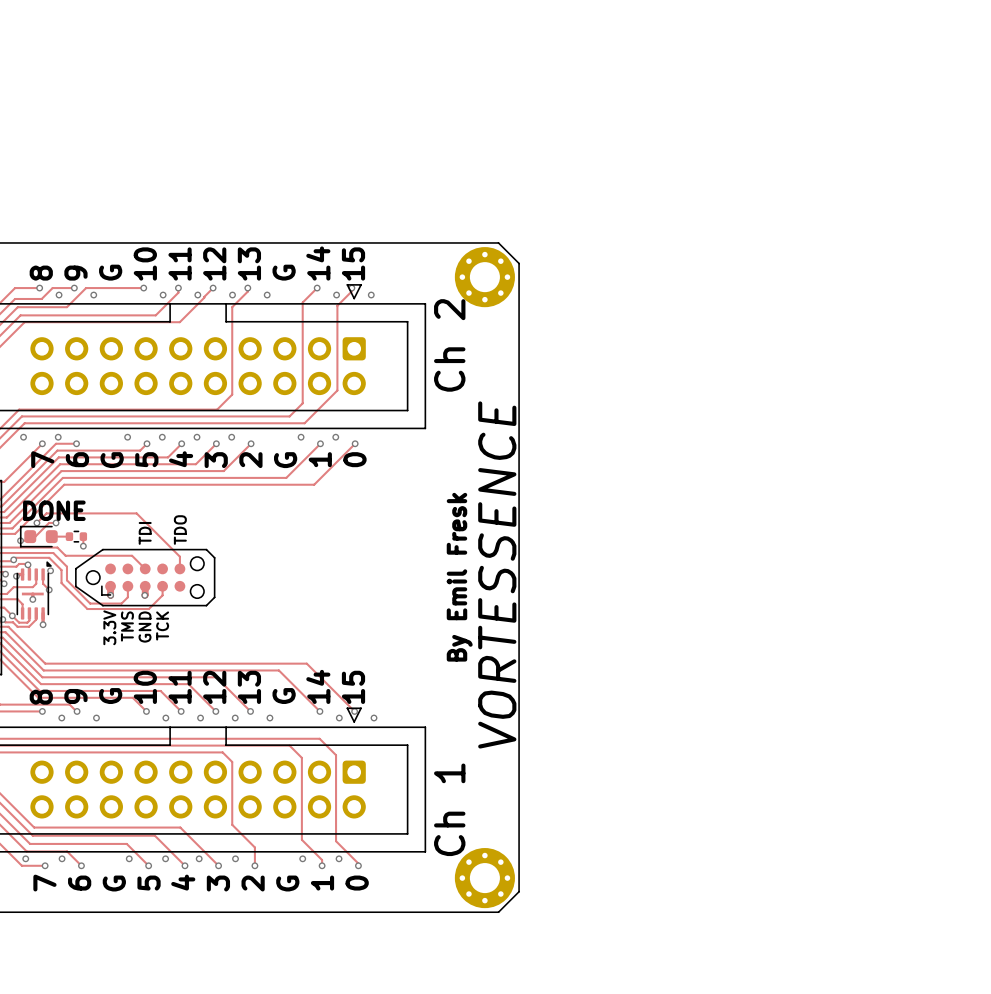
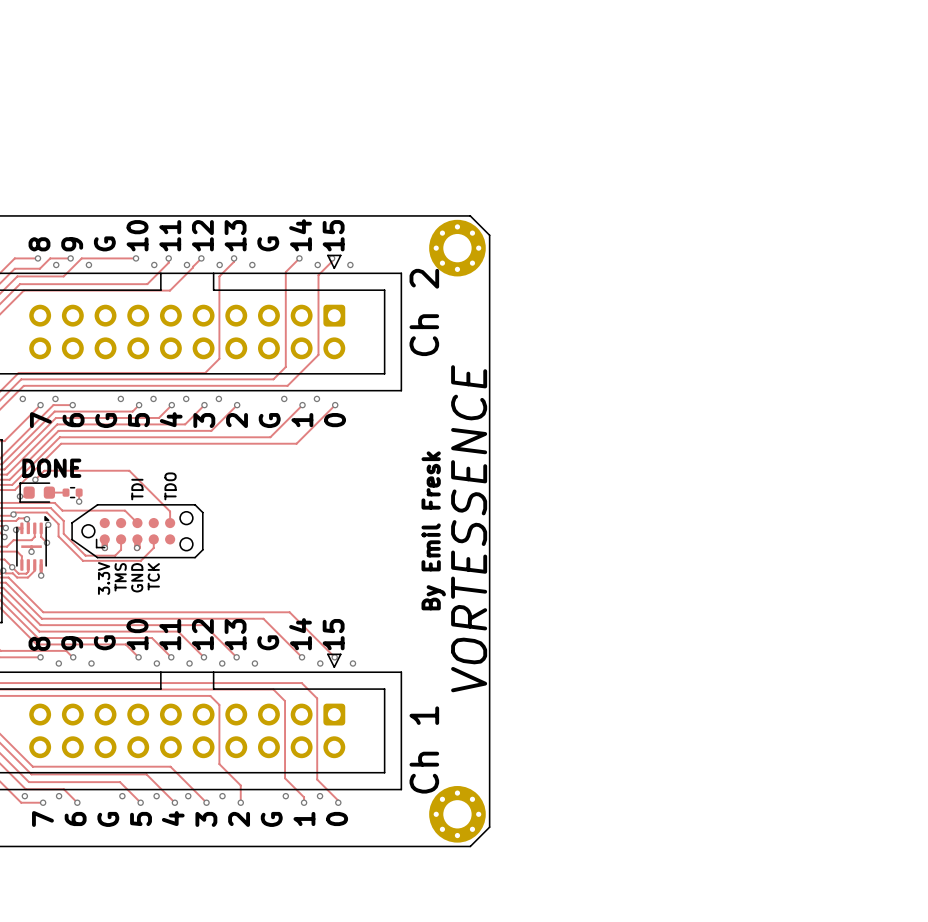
track: (56, 522) (49, 522) (35, 536) (30, 536) -> none
via: (56, 522) -> none

